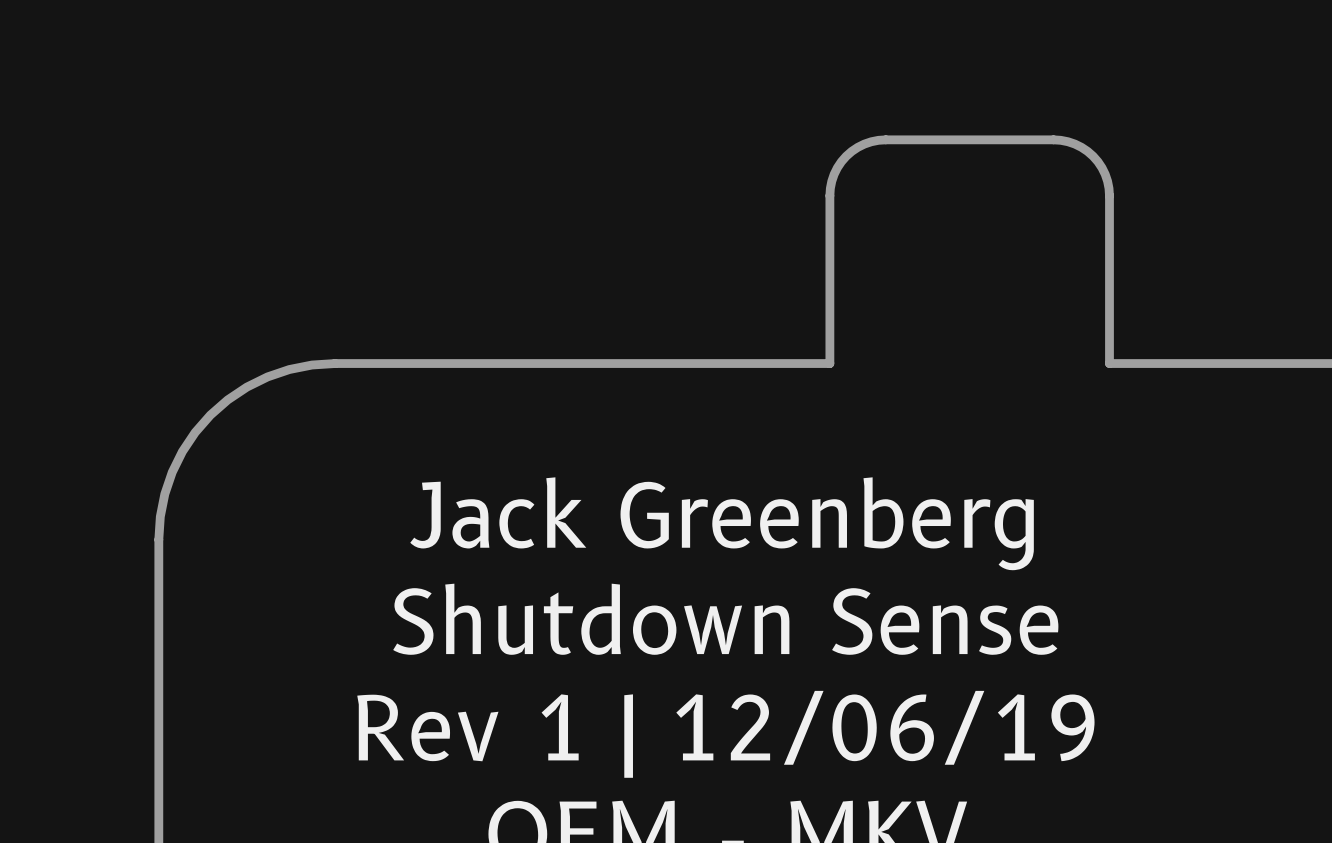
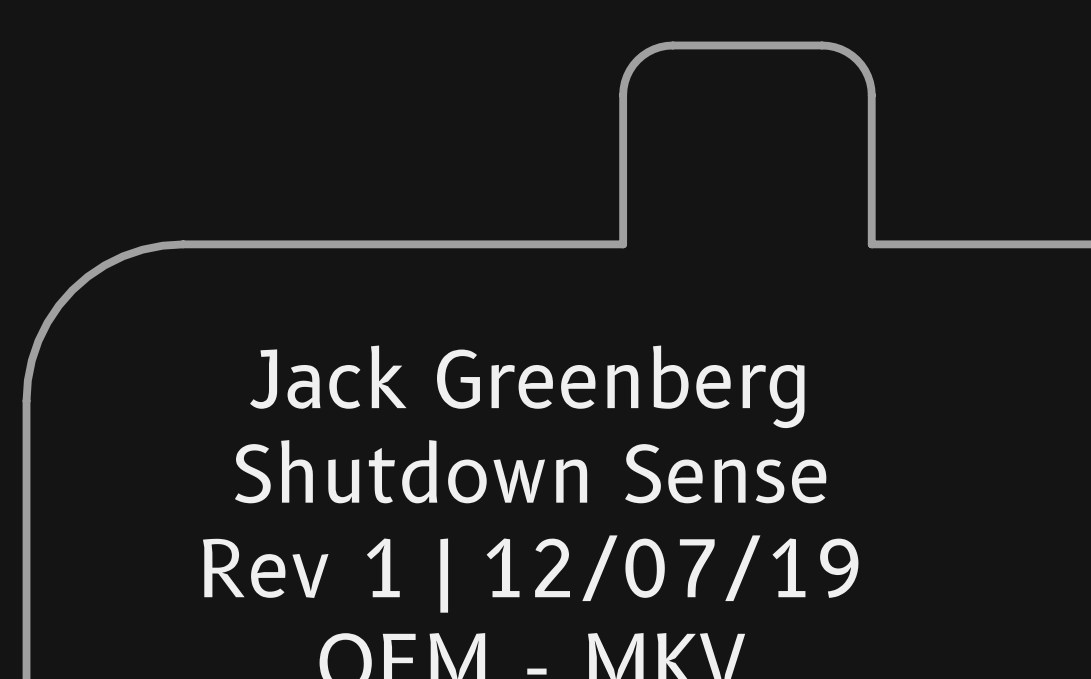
text: Rev 1 | 12/06/19 (725, 734) -> Rev 1 | 12/07/19 (530, 574)

